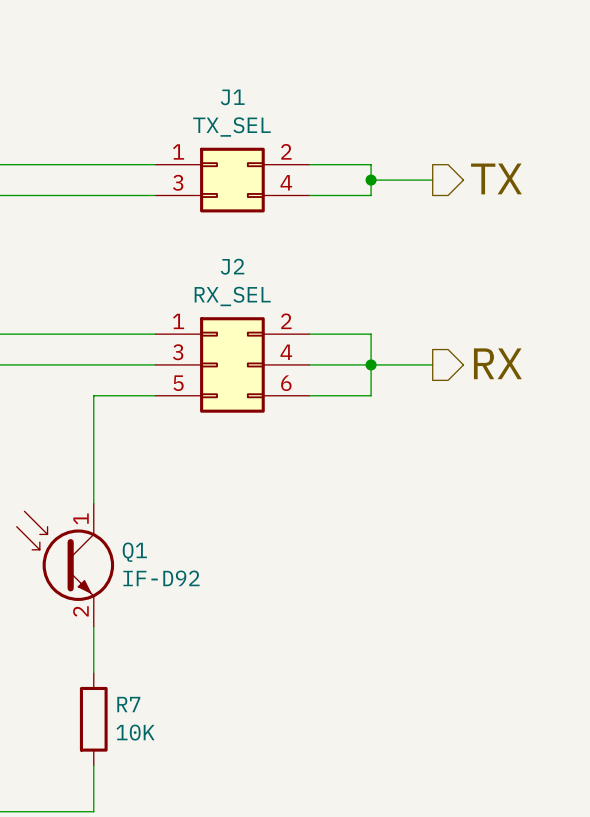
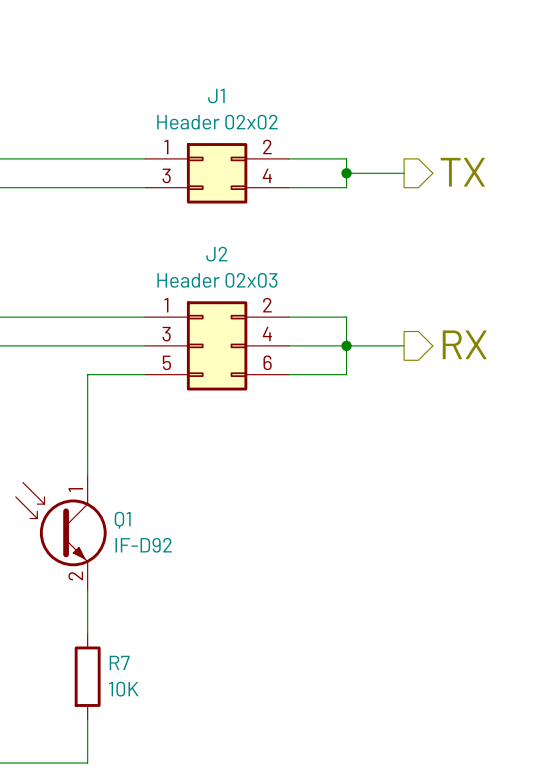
J1 value: TX_SEL (231, 127) -> Header 02x02 (217, 122)
J2 value: RX_SEL (232, 296) -> Header 02x03 (217, 280)

